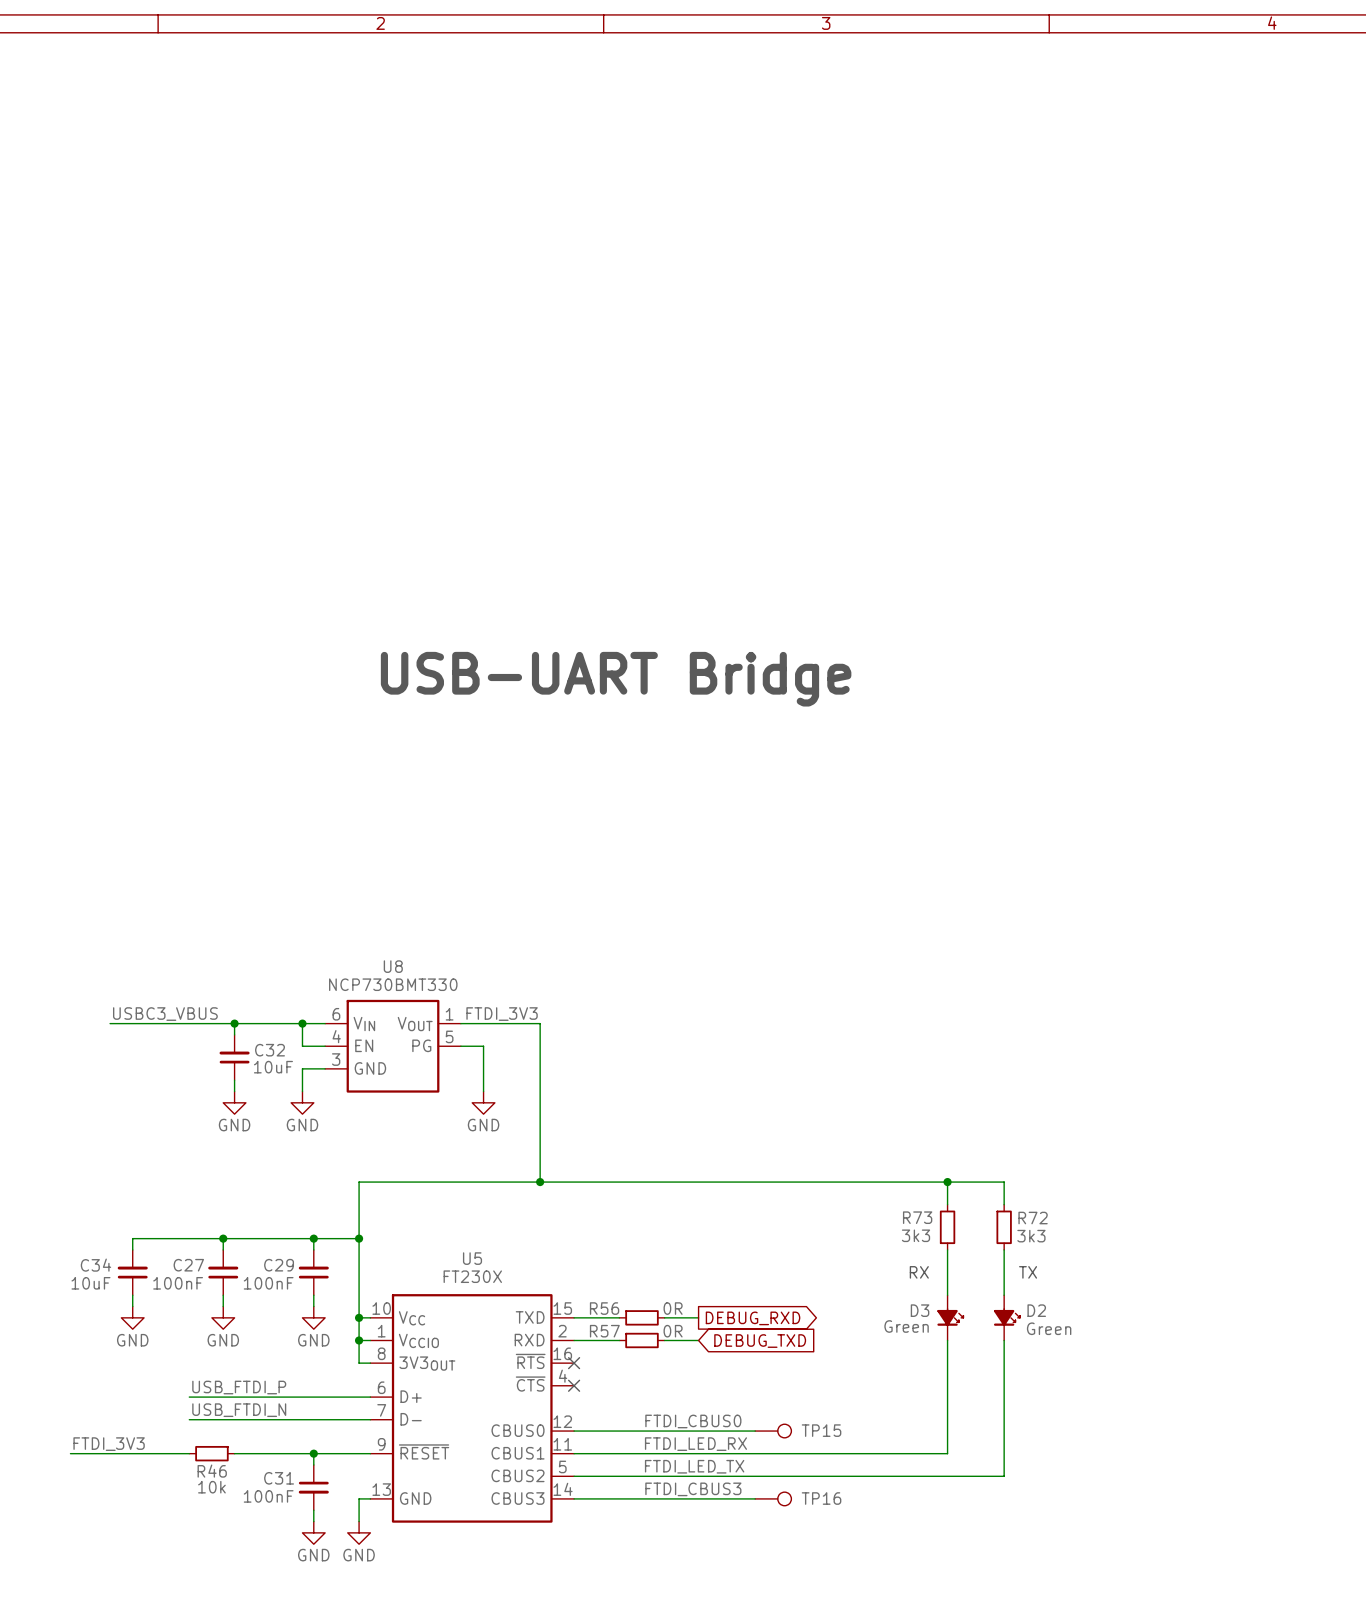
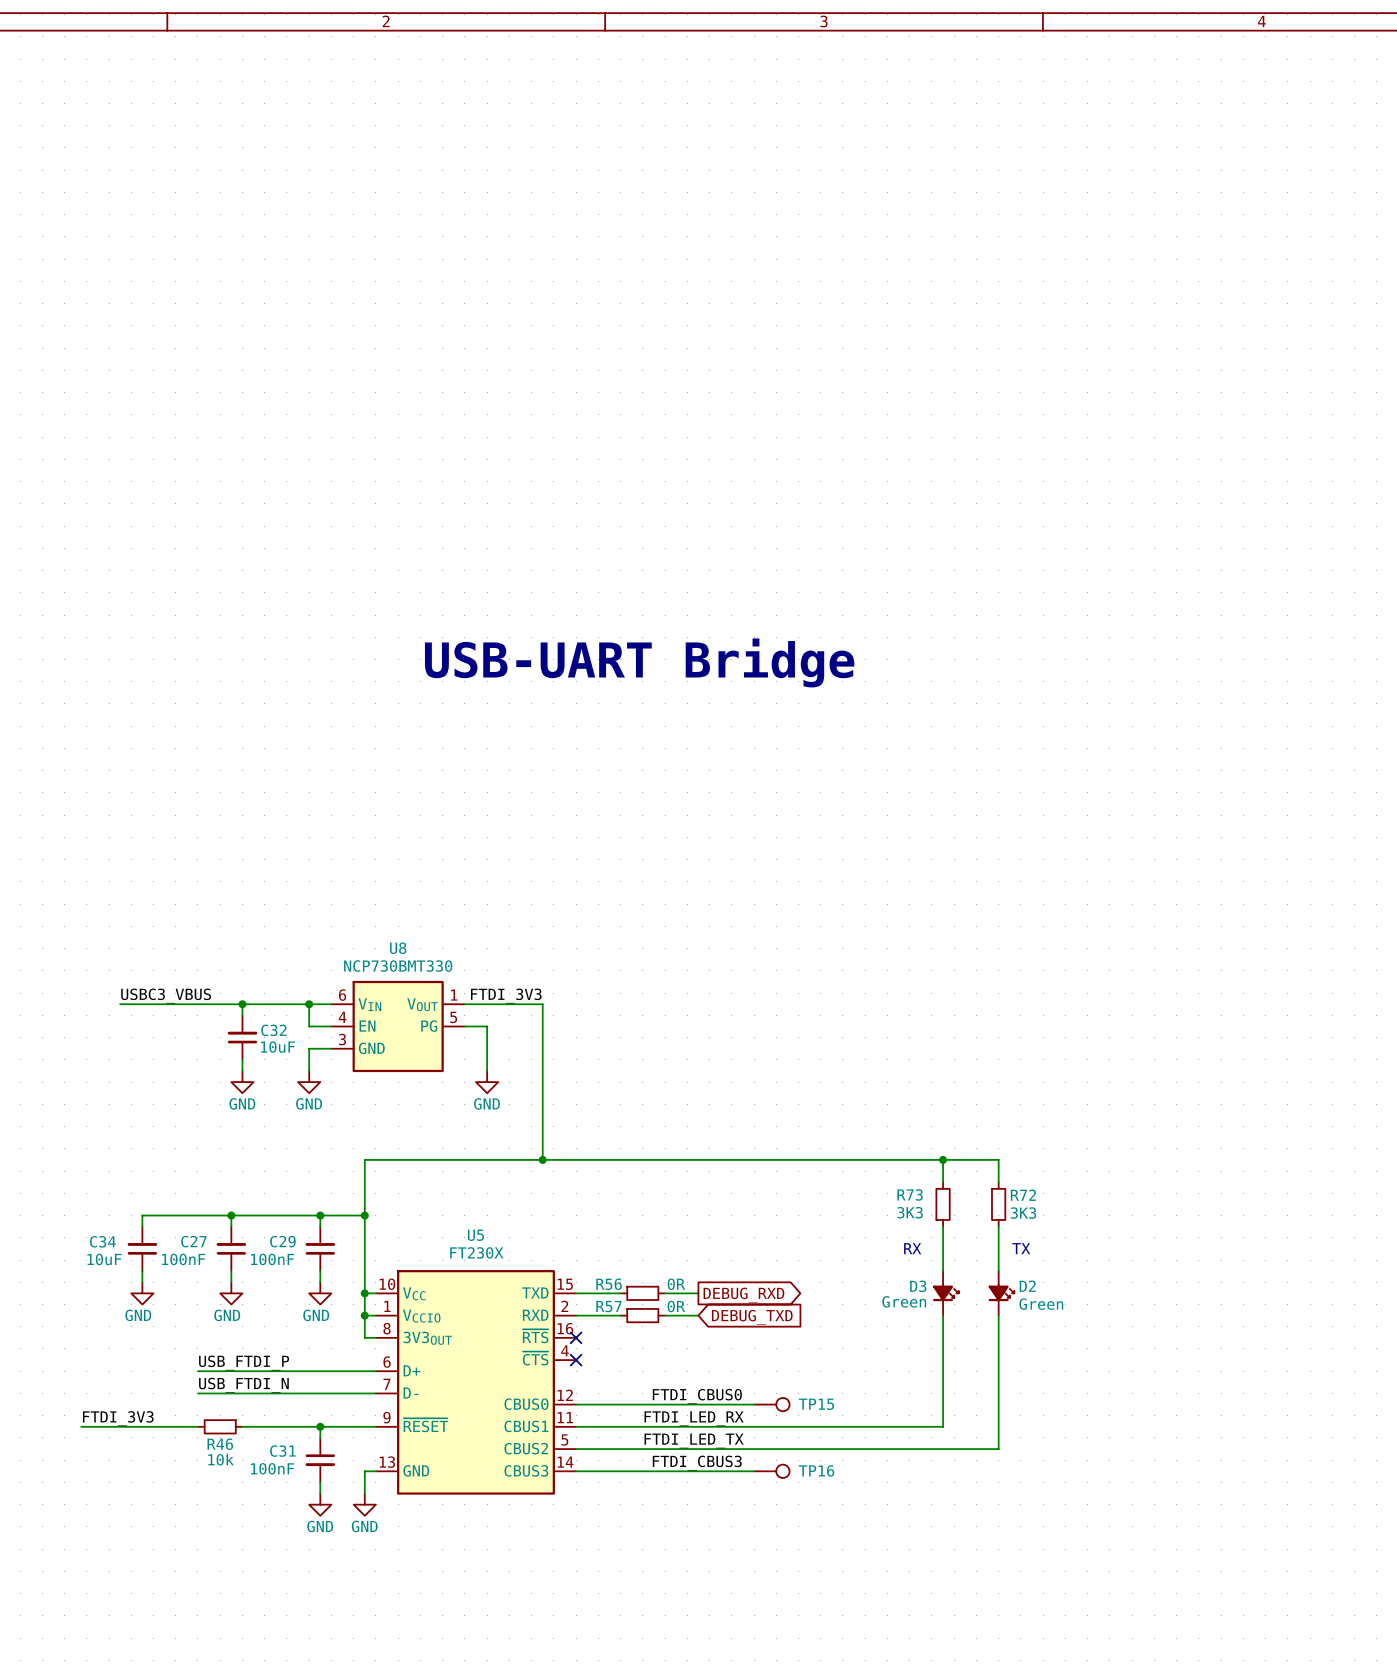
R73 value: 3k3 (915, 1235) -> 3K3 (910, 1212)
R72 value: 3k3 (1031, 1236) -> 3K3 (1023, 1213)

